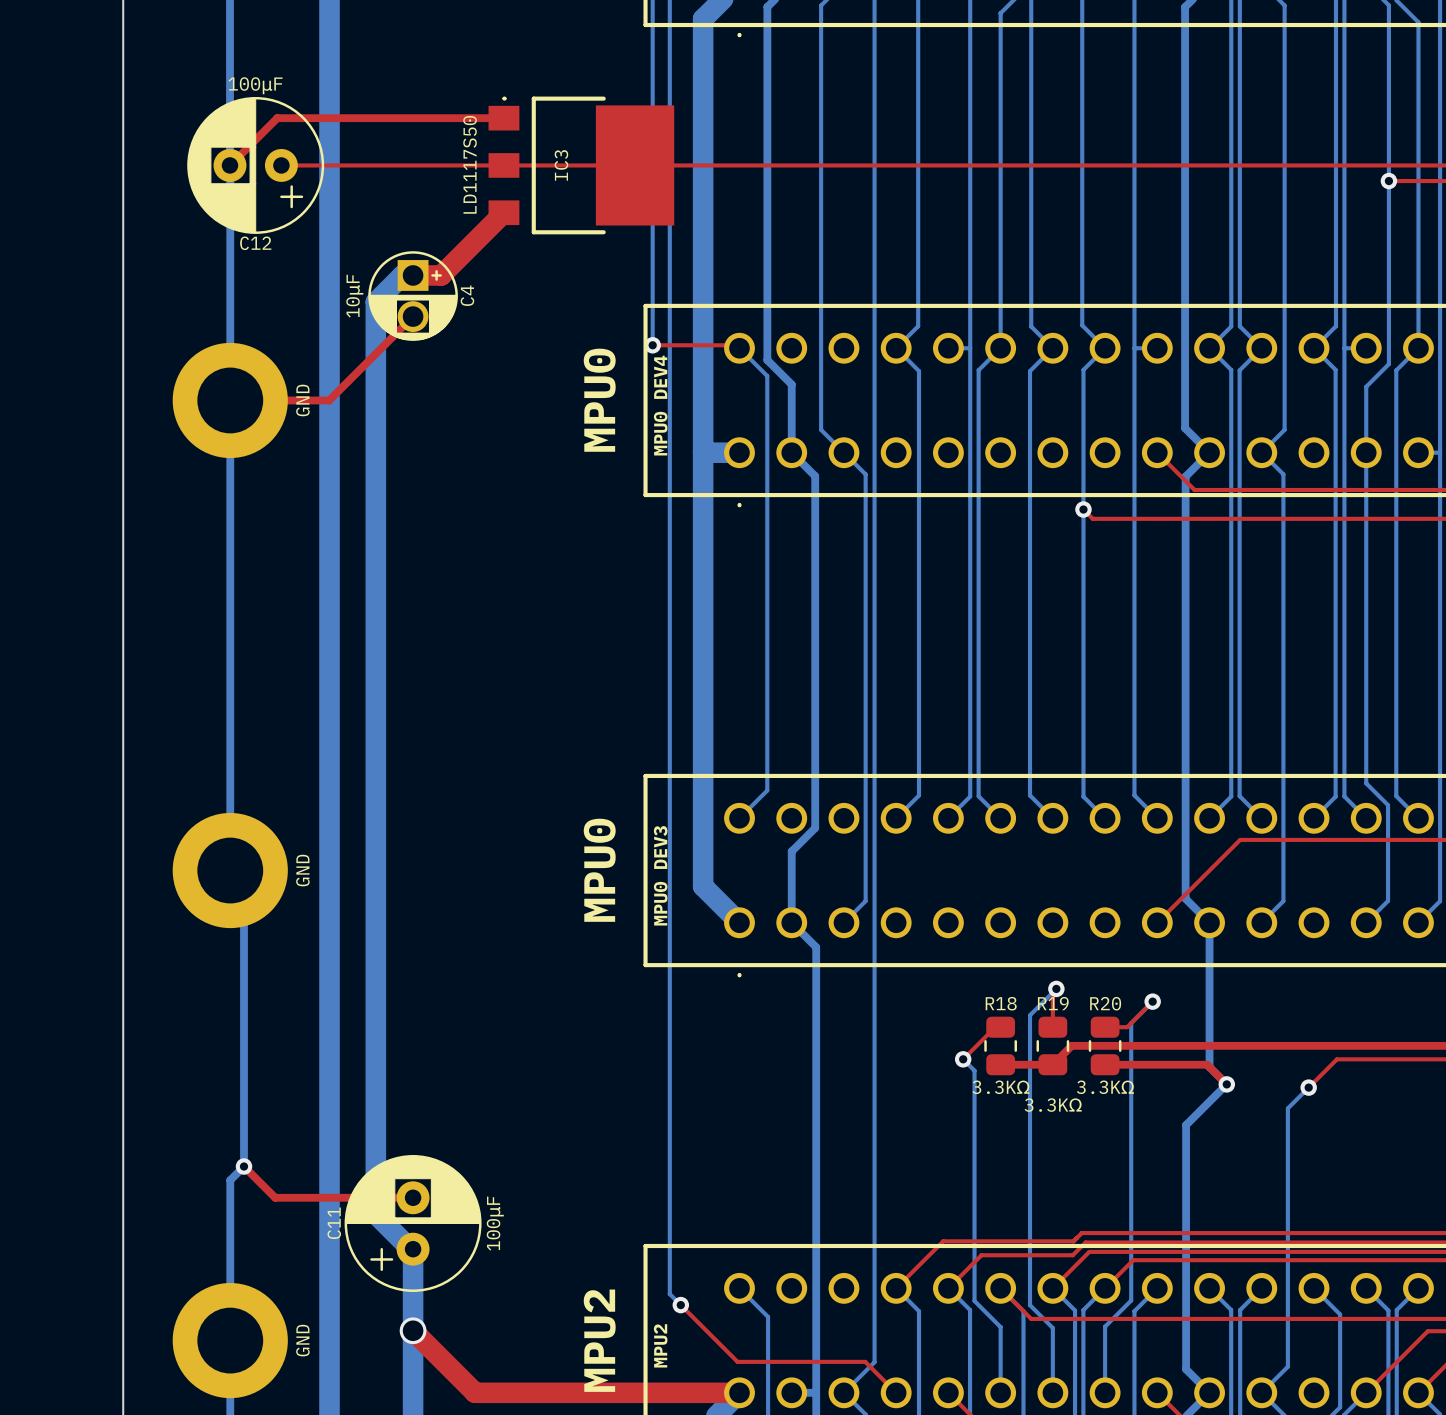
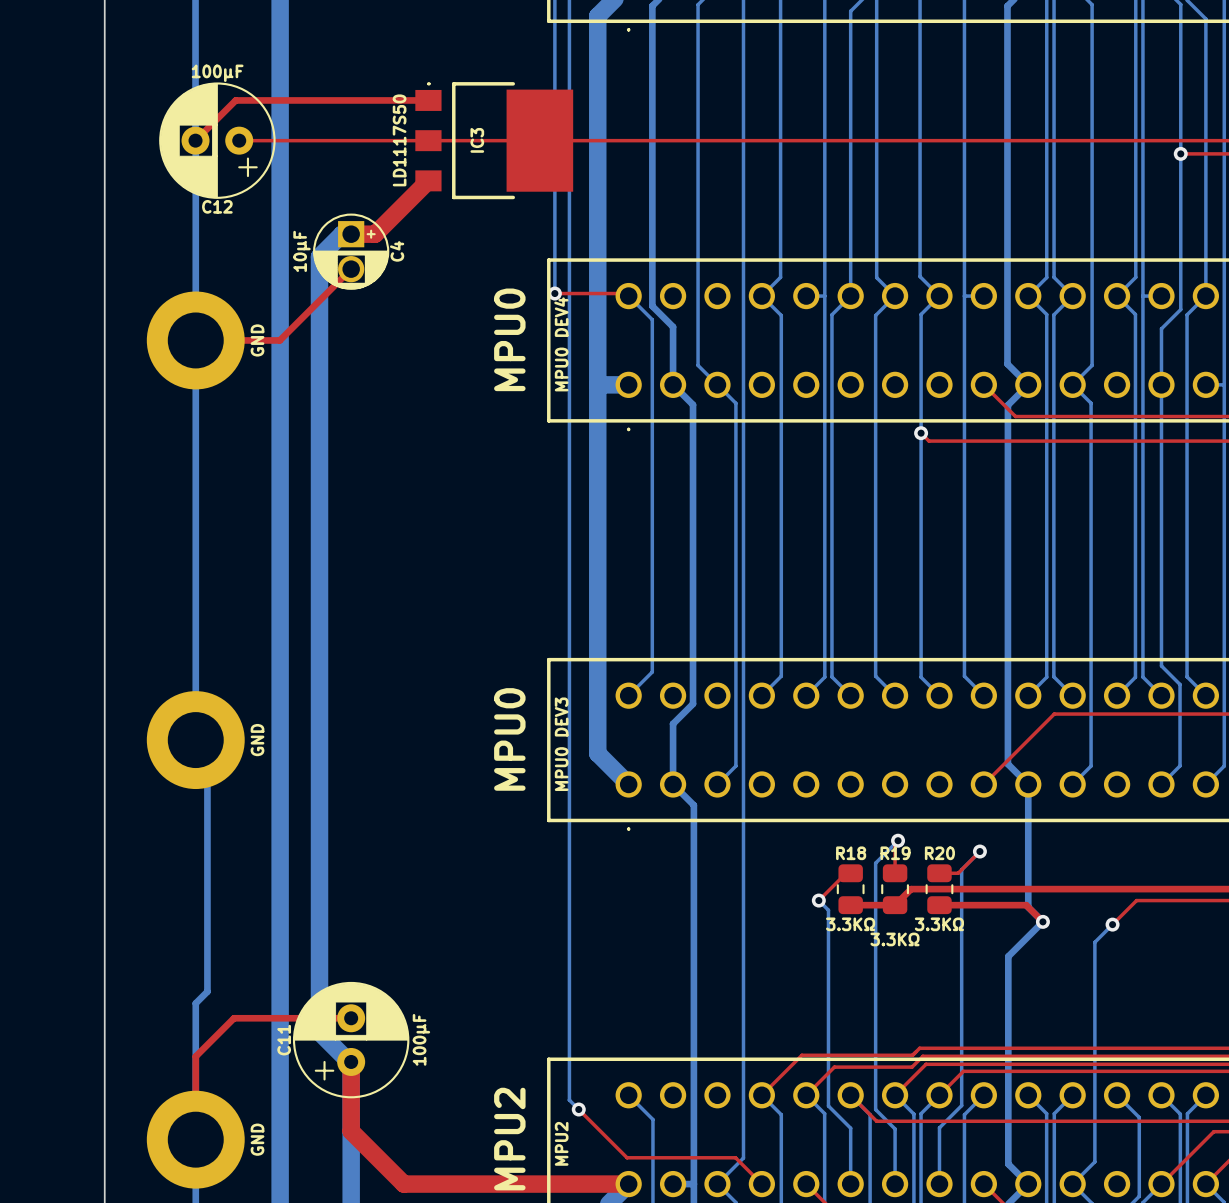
top track: (244, 1166) (275, 1197) -> (195, 1139) (195, 1056) (234, 1018)
via: (244, 1166) -> none
top track: none -> (351, 1061) (351, 1131)
via: (413, 1330) -> none

